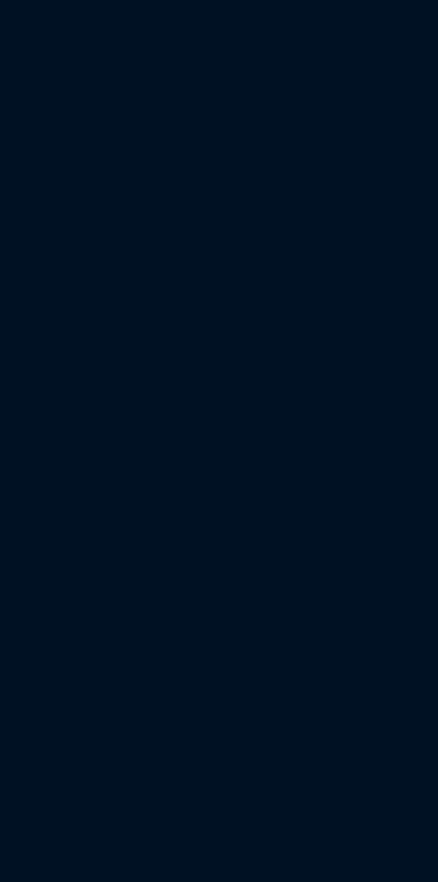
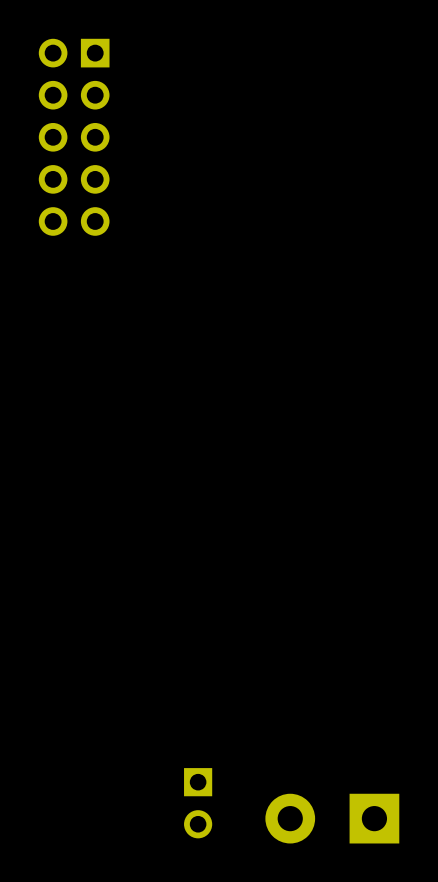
part: none -> (74, 137)
part: none -> (198, 803)
part: none -> (332, 818)

